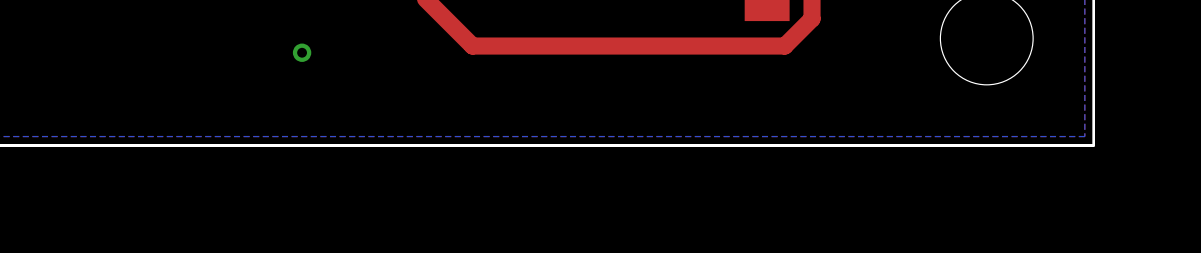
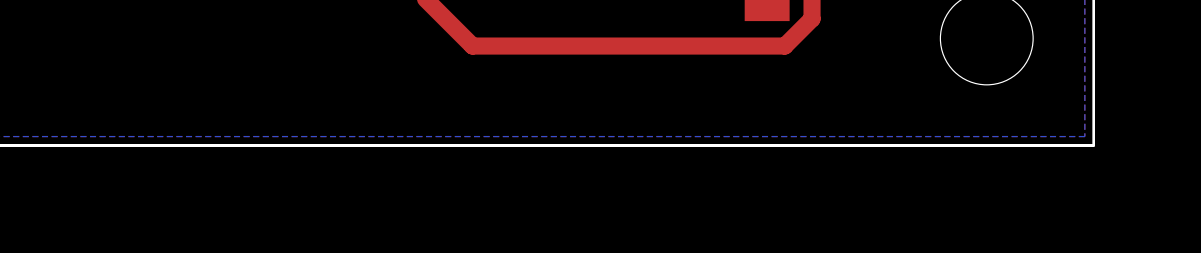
via: (302, 52) -> none

